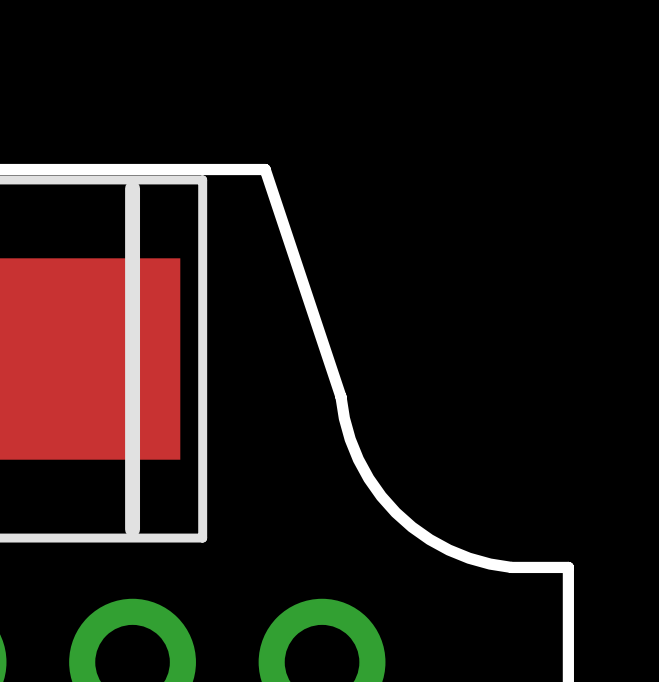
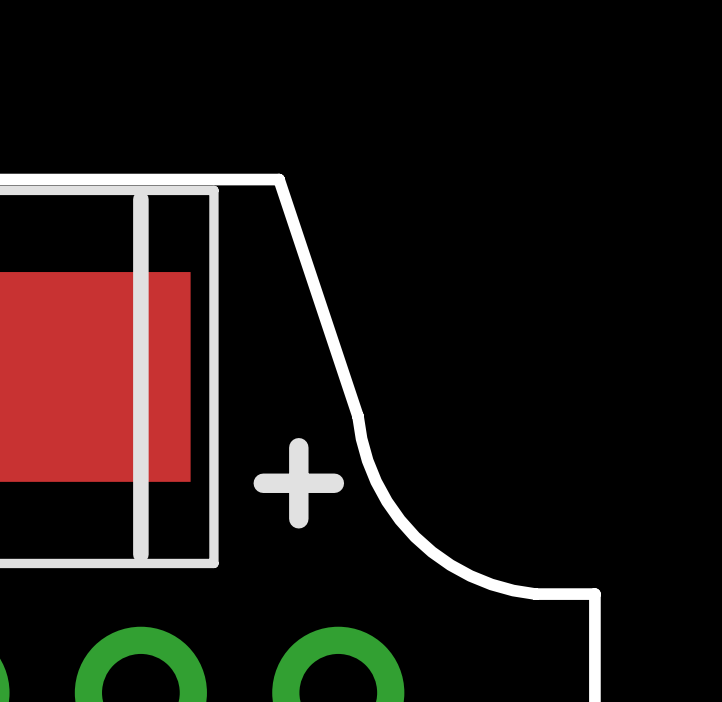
text: none -> + (298, 483)

